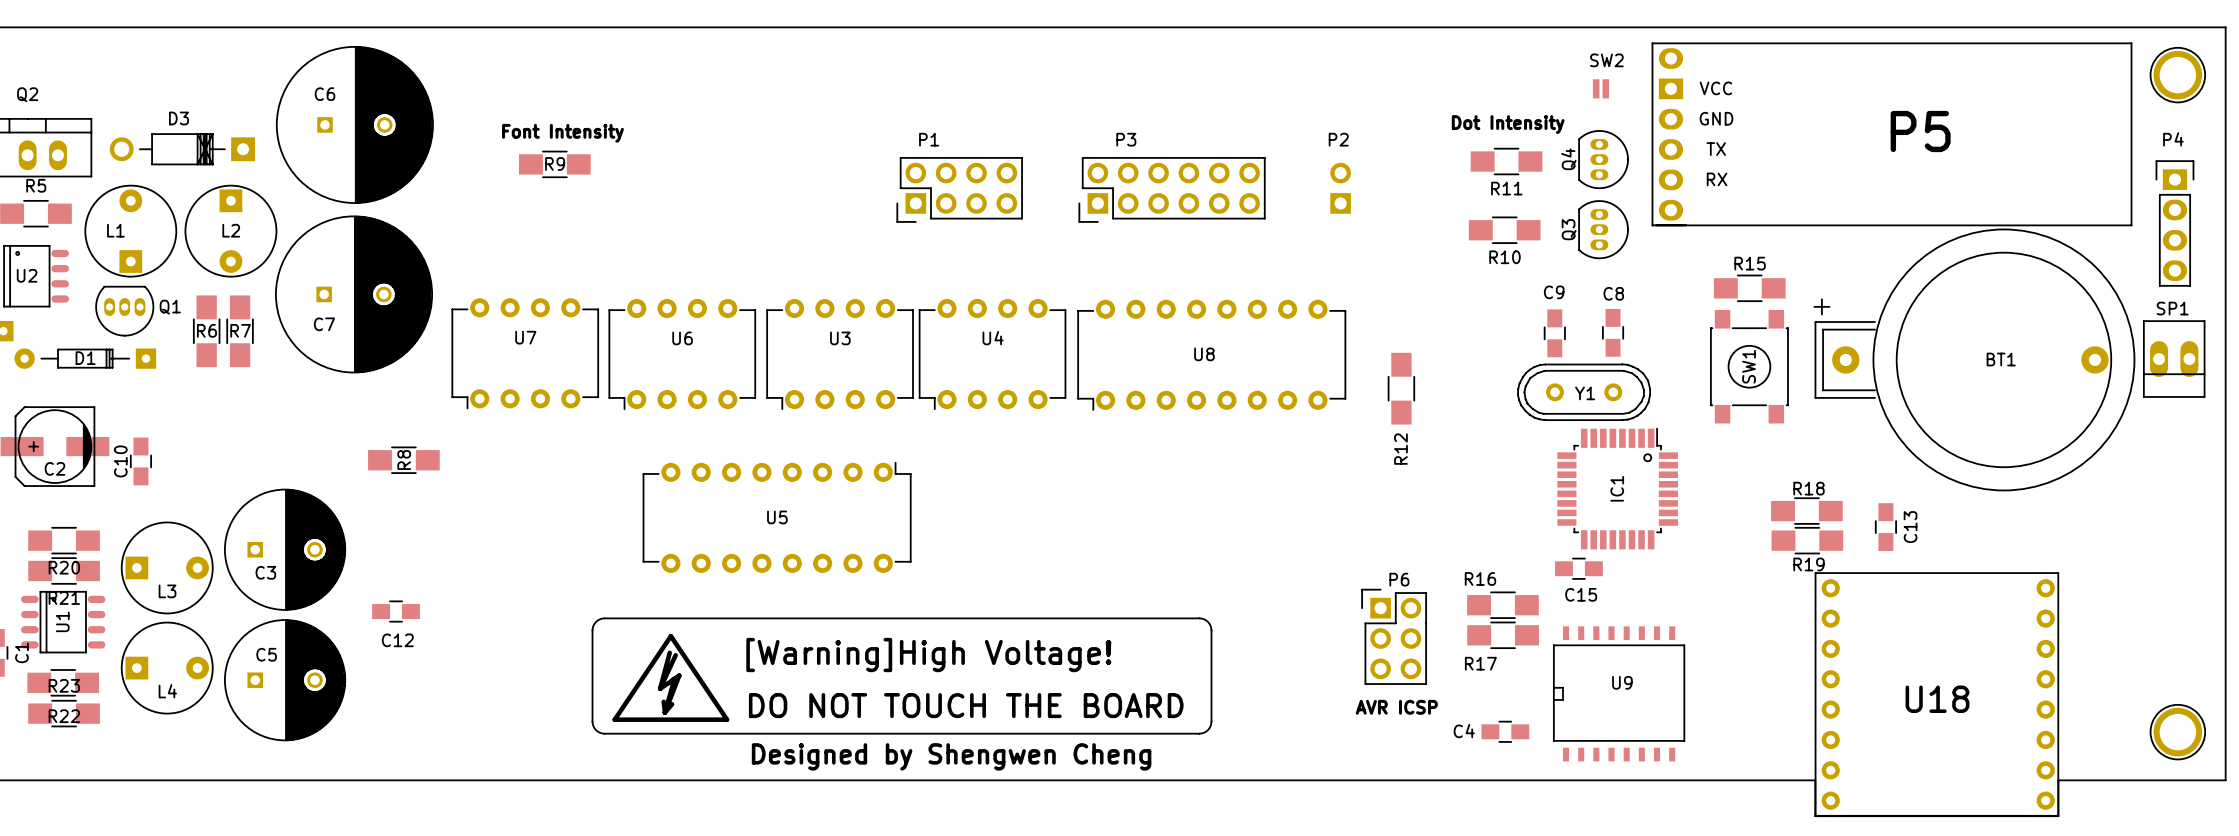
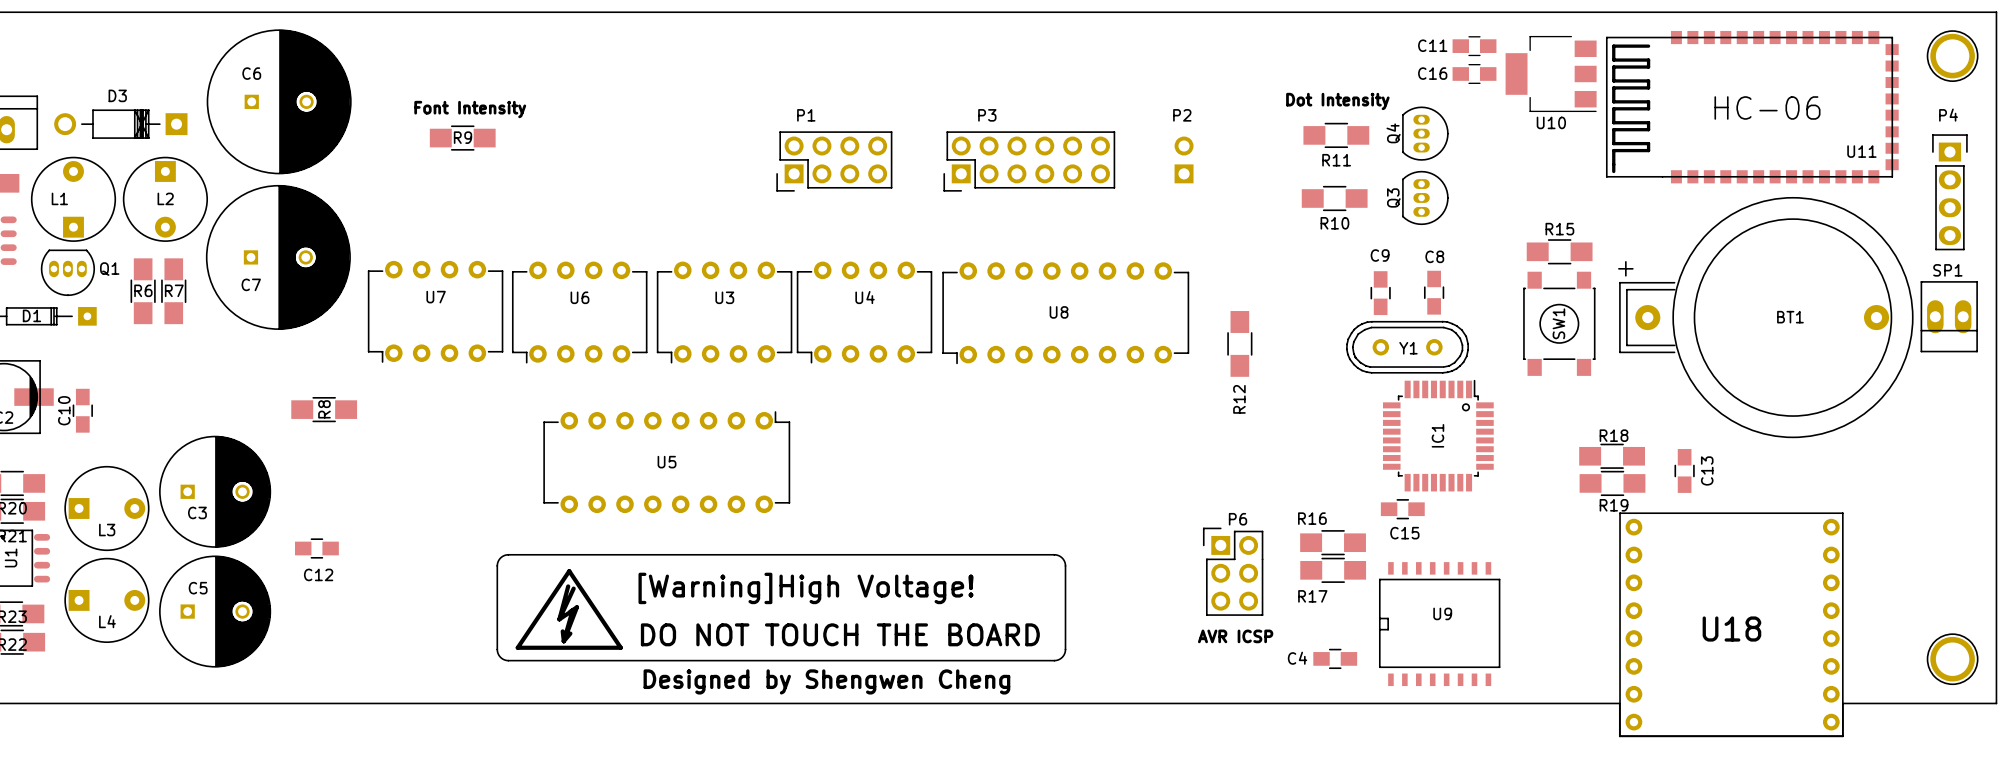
C16: none -> (1474, 46)
SW2: (1600, 88) -> none
C11: none -> (1474, 73)
U10: none -> (1551, 73)
U11: none -> (1752, 107)
P5: (1891, 134) -> none

